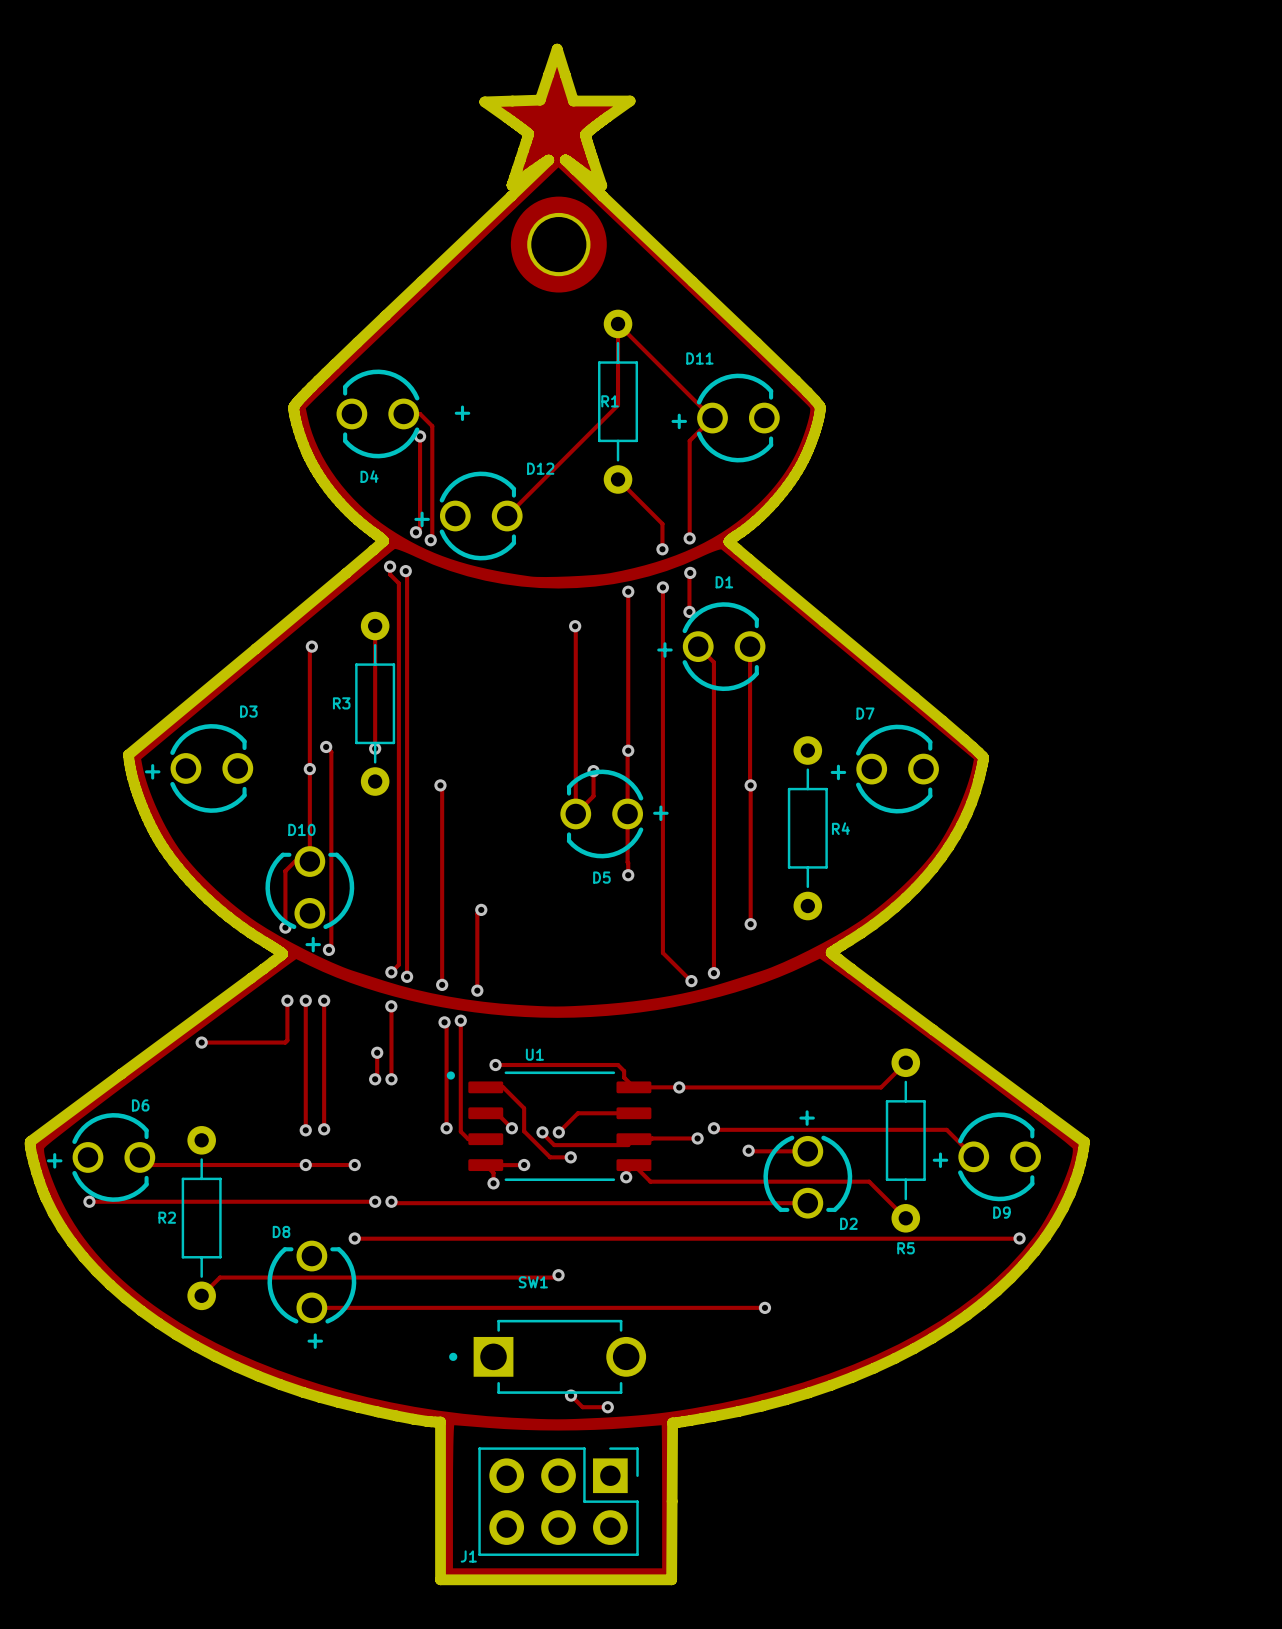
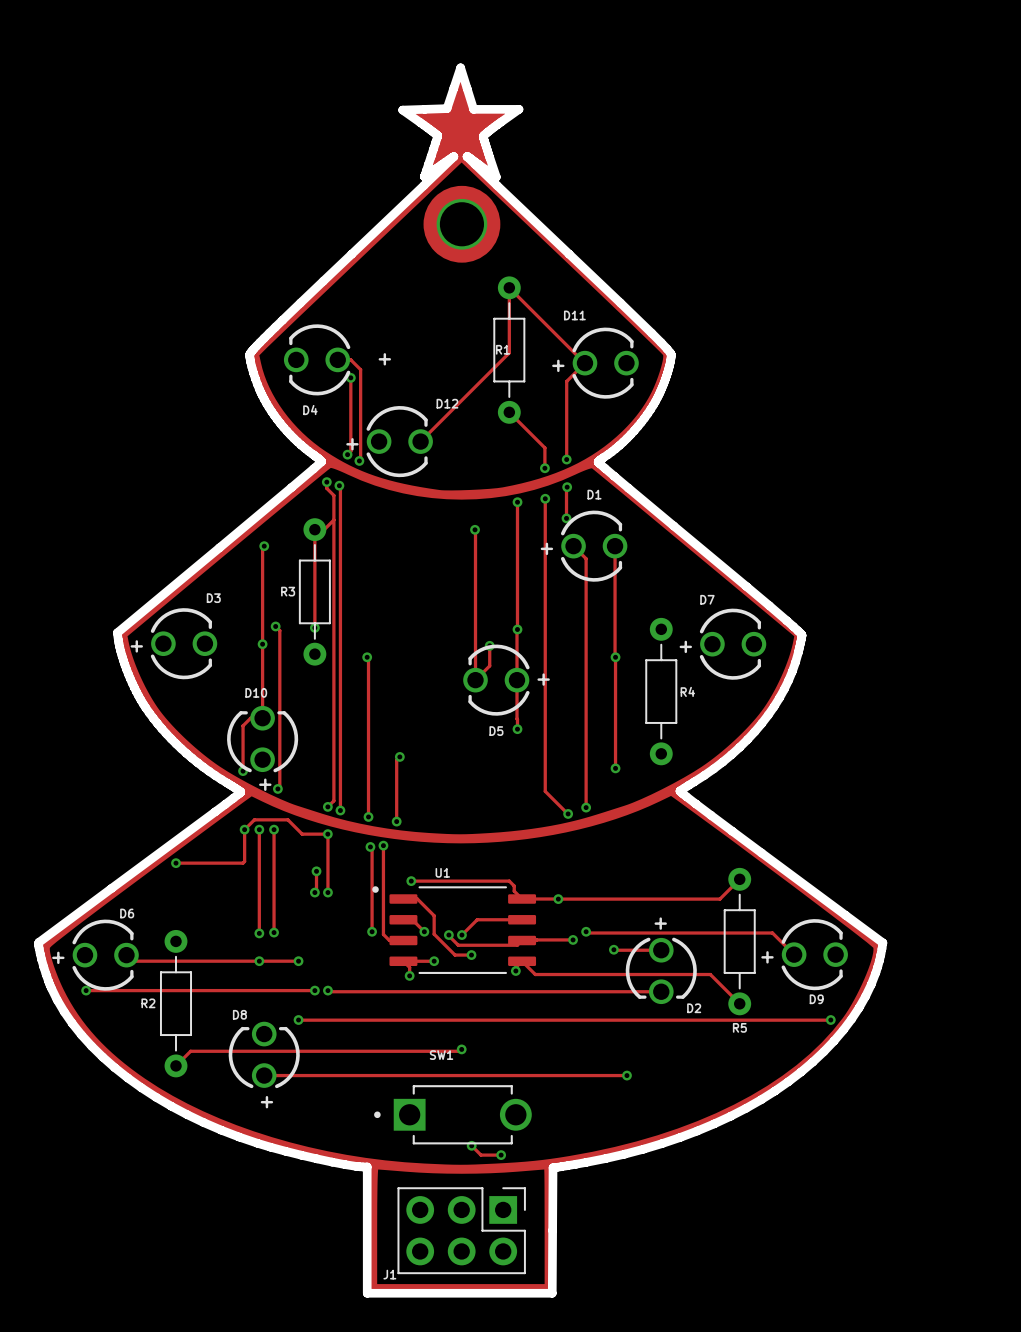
track: none -> (333, 520) (324, 529) (314, 529)
track: none -> (244, 829) (254, 819) (287, 819) (302, 834) (327, 834)

